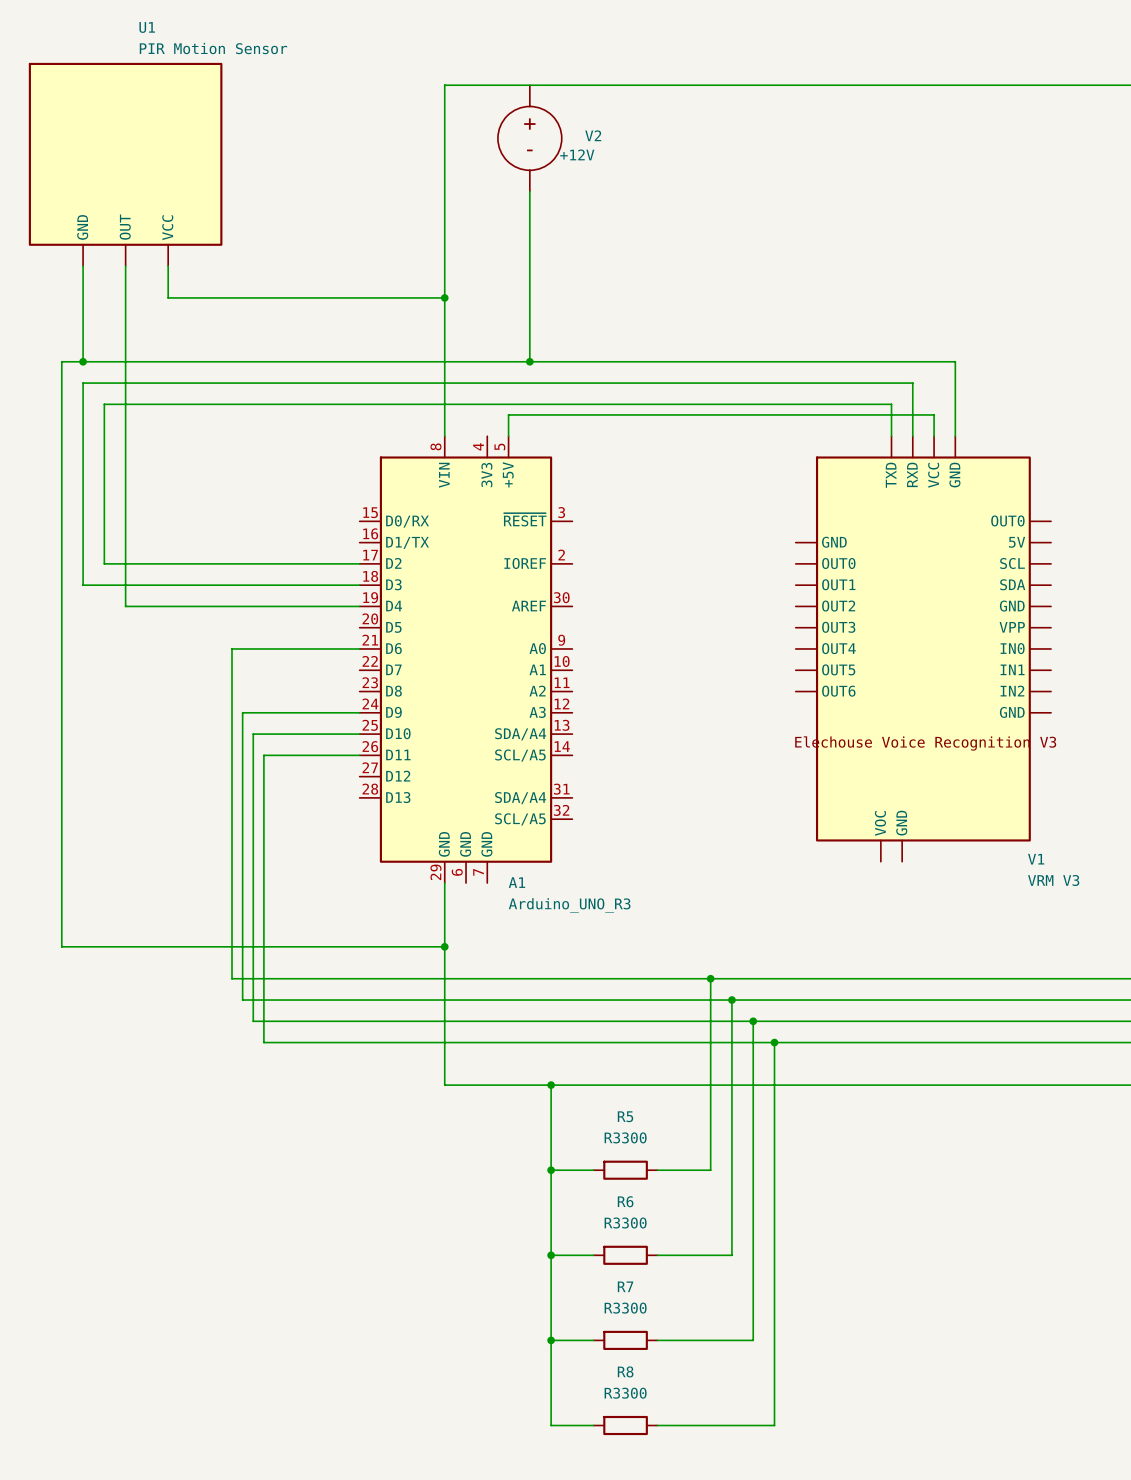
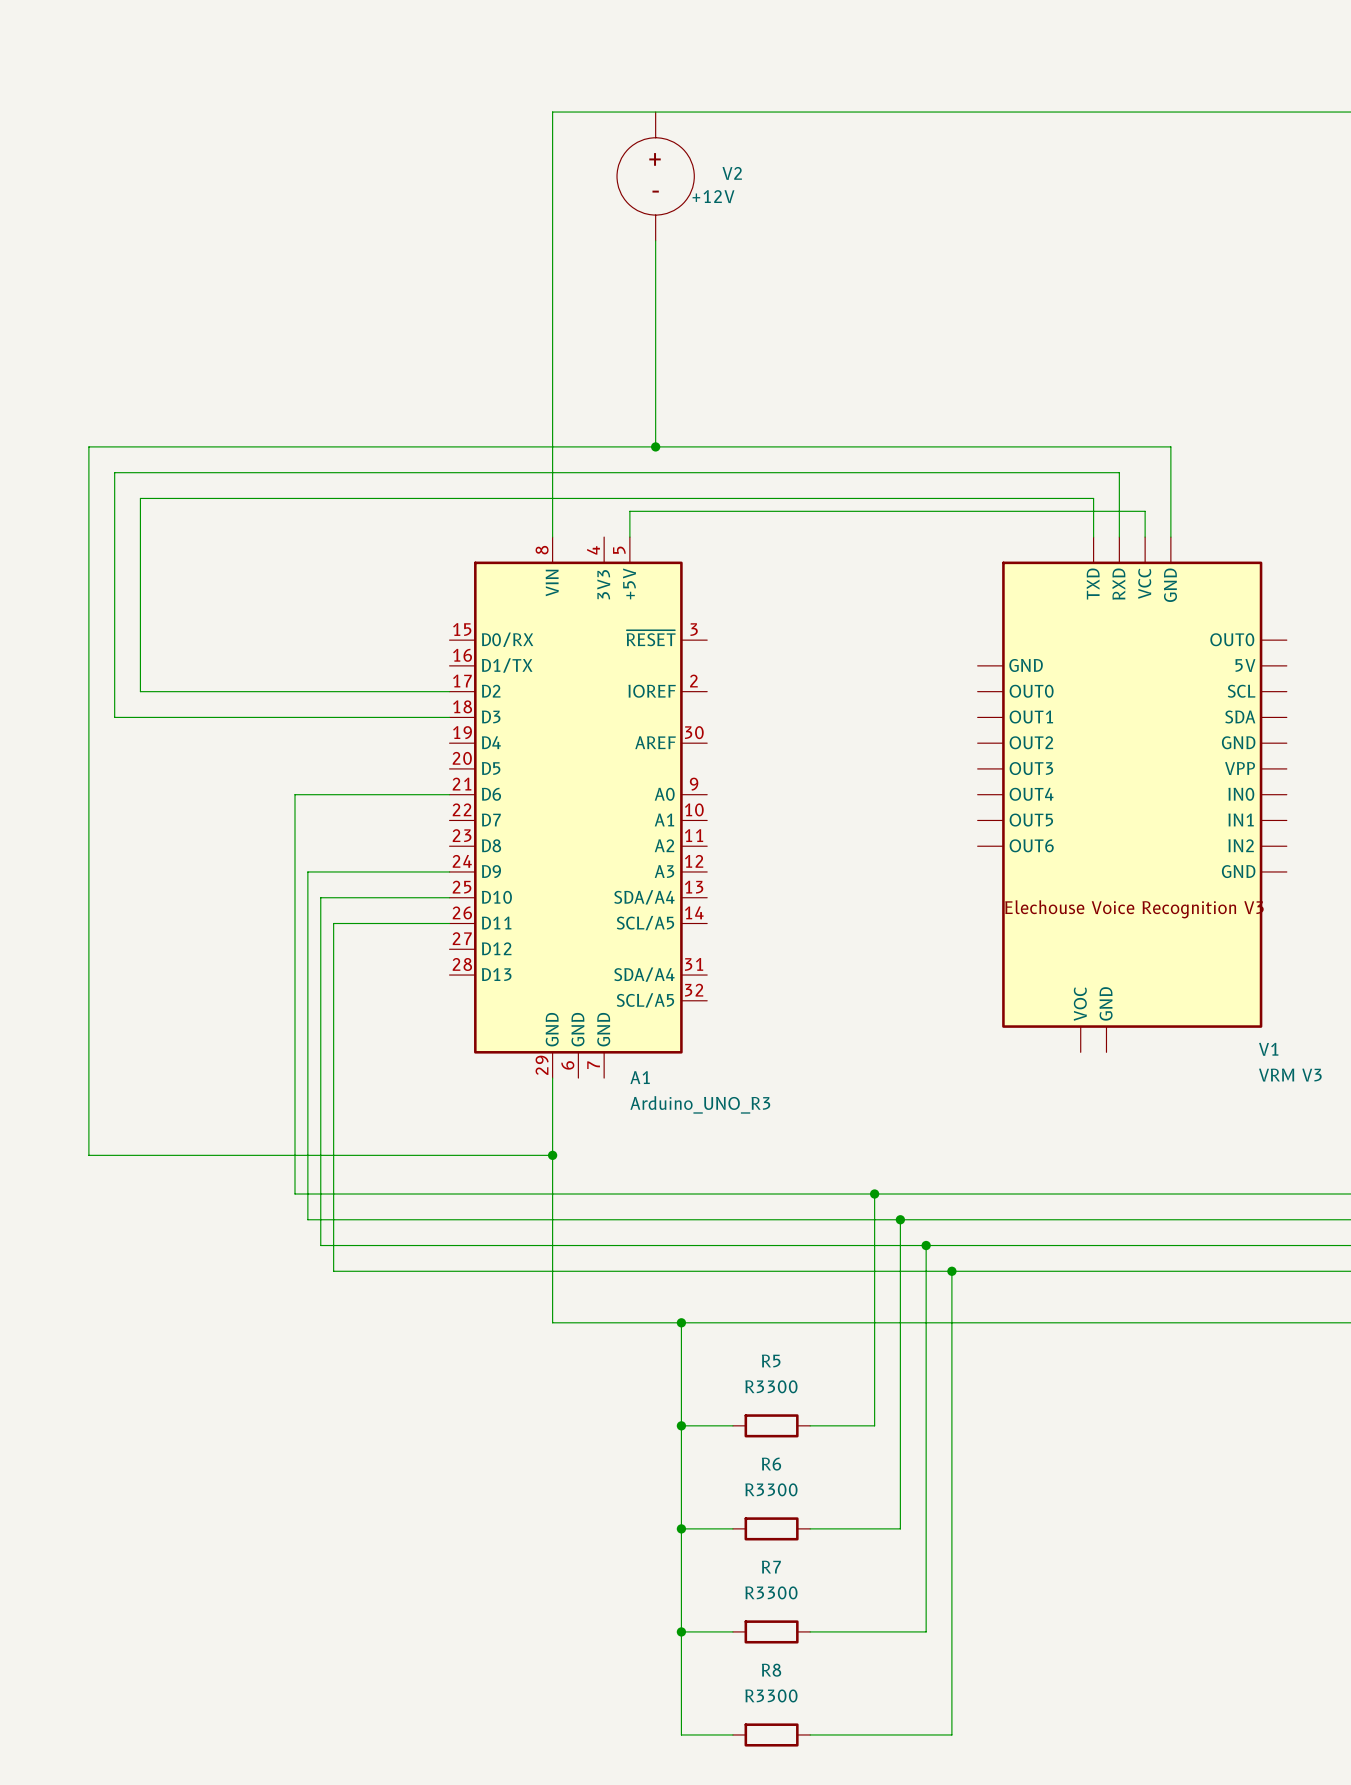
U1: PIR Motion Sensor (125, 164) -> none
wire: (83, 266) (83, 361) -> none
wire: (125, 266) (125, 606) (359, 606) -> none
wire: (168, 266) (168, 297) (444, 297) -> none
junction: (444, 297) -> none
junction: (83, 361) -> none

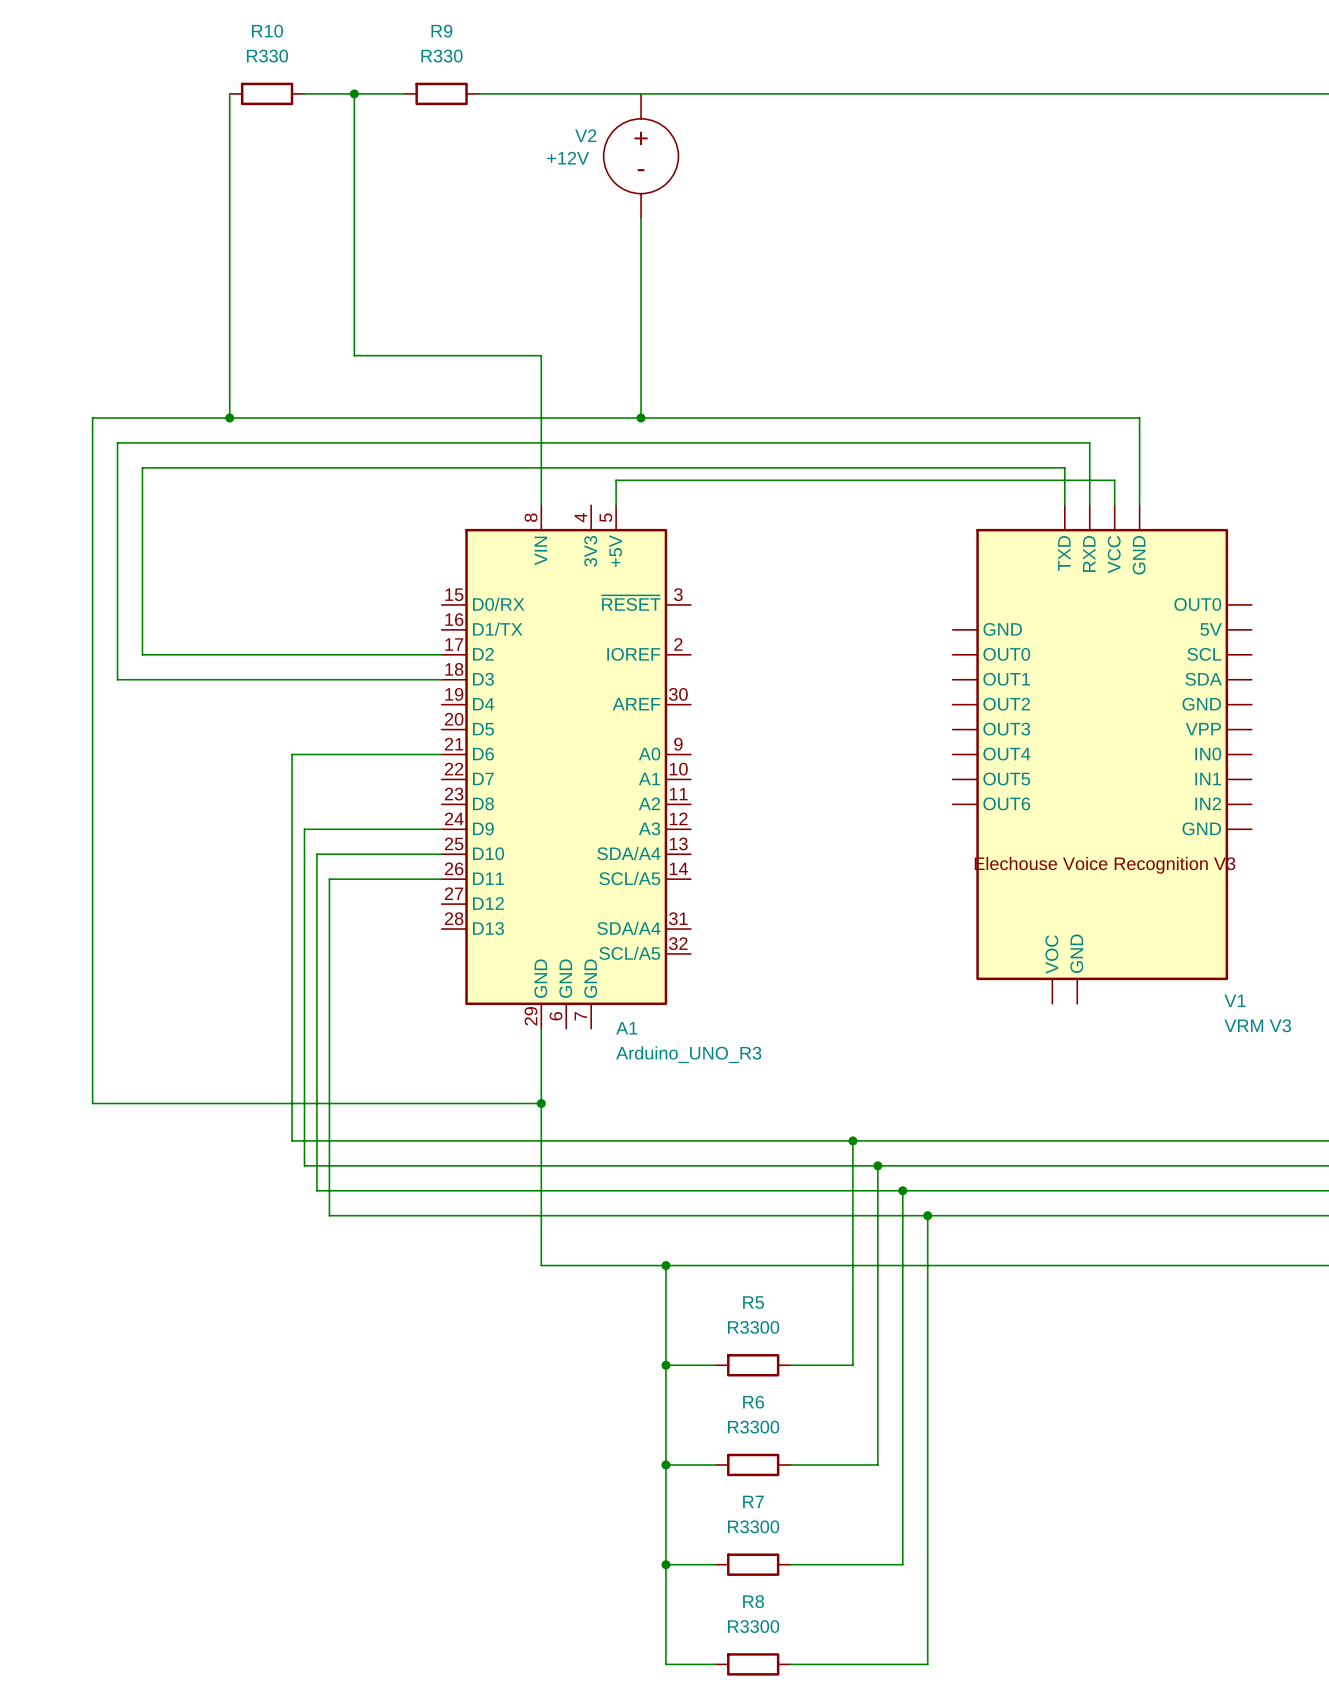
wire: none -> (229, 93) (229, 417)
R10: none -> R330 (267, 93)
wire: none -> (304, 93) (404, 93)
junction: none -> (354, 93)
R9: none -> R330 (441, 93)
wire: none -> (478, 93) (541, 93)
wire: (552, 112) (552, 382) -> (354, 93) (354, 355) (541, 355)
V2 name position: V2 (732, 173) -> V2 (585, 135)
V2 value position: +12V (713, 196) -> +12V (568, 158)
junction: none -> (229, 417)

